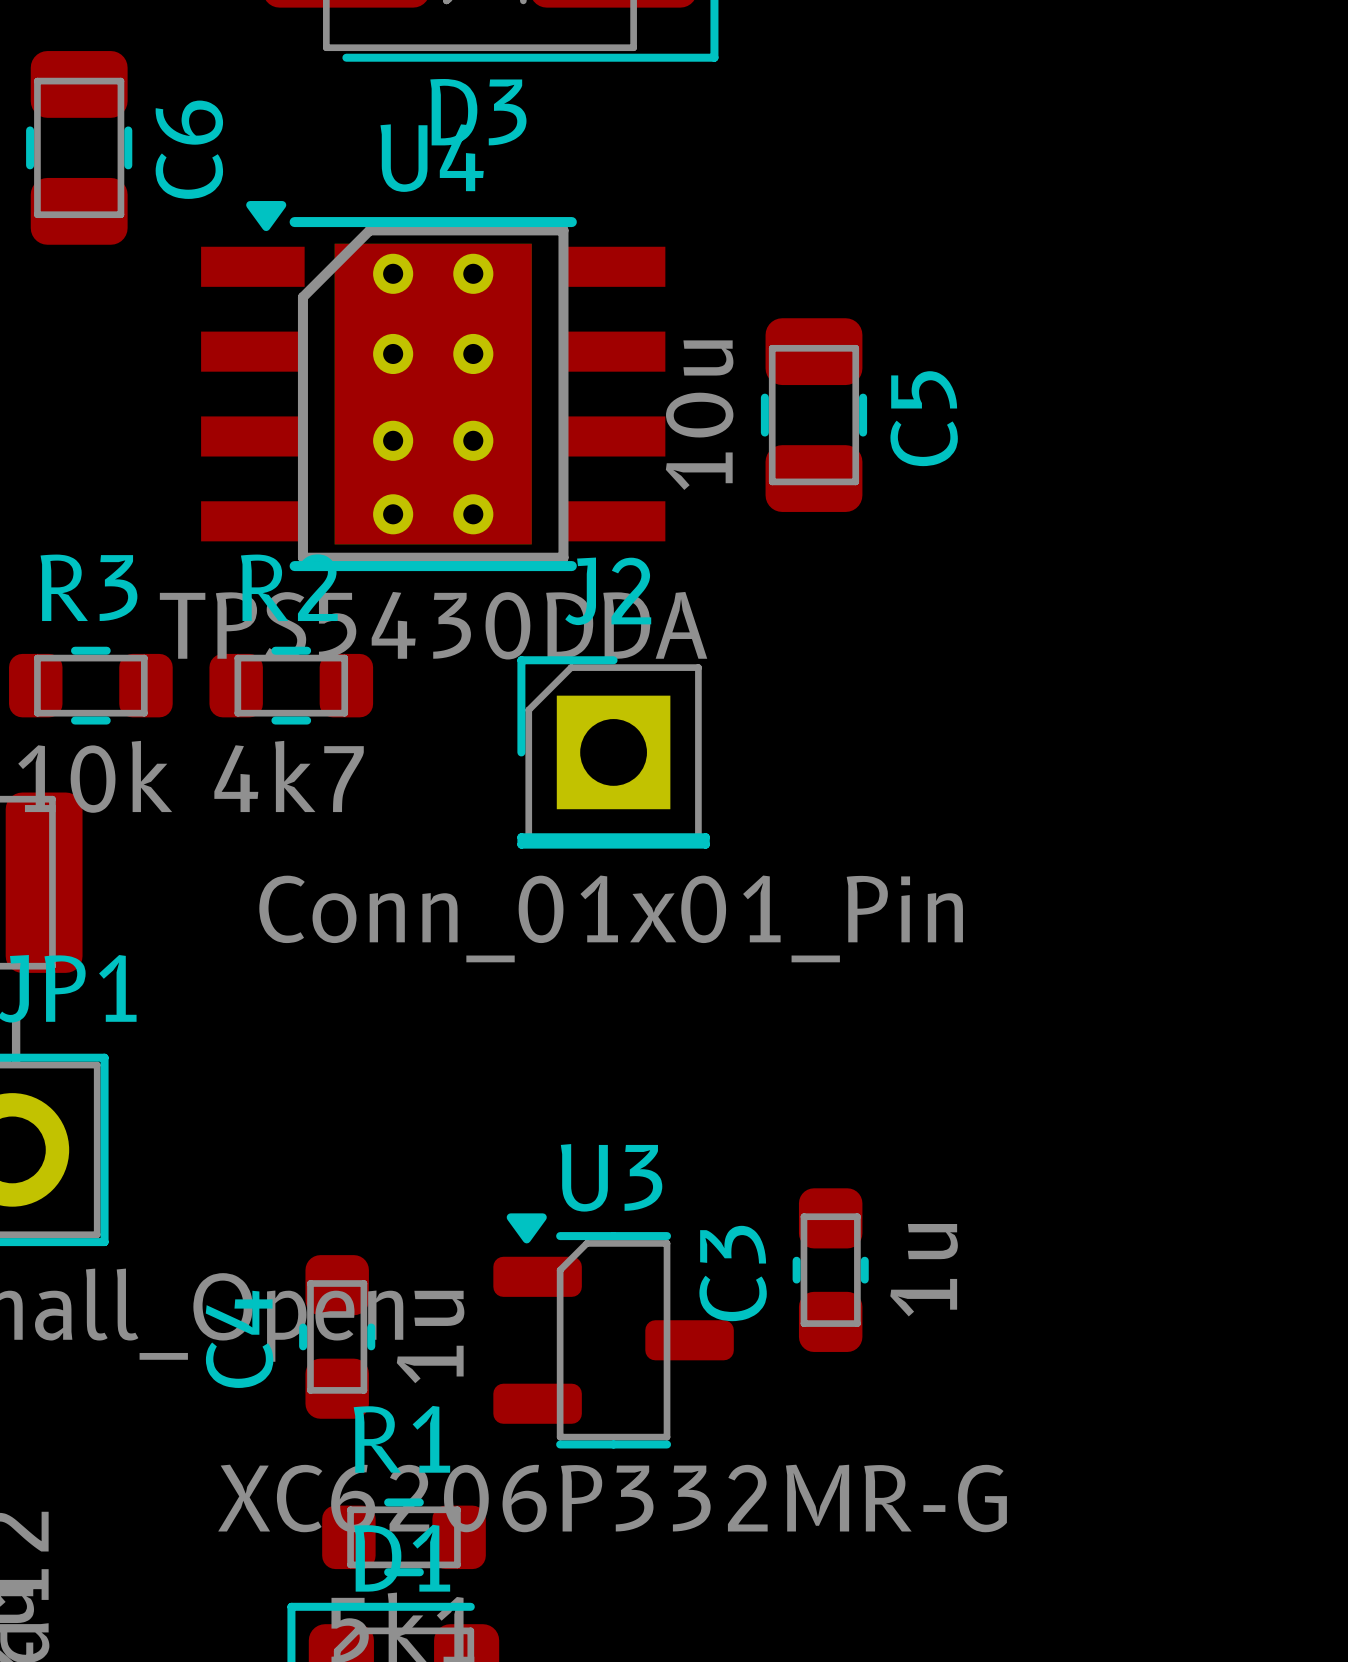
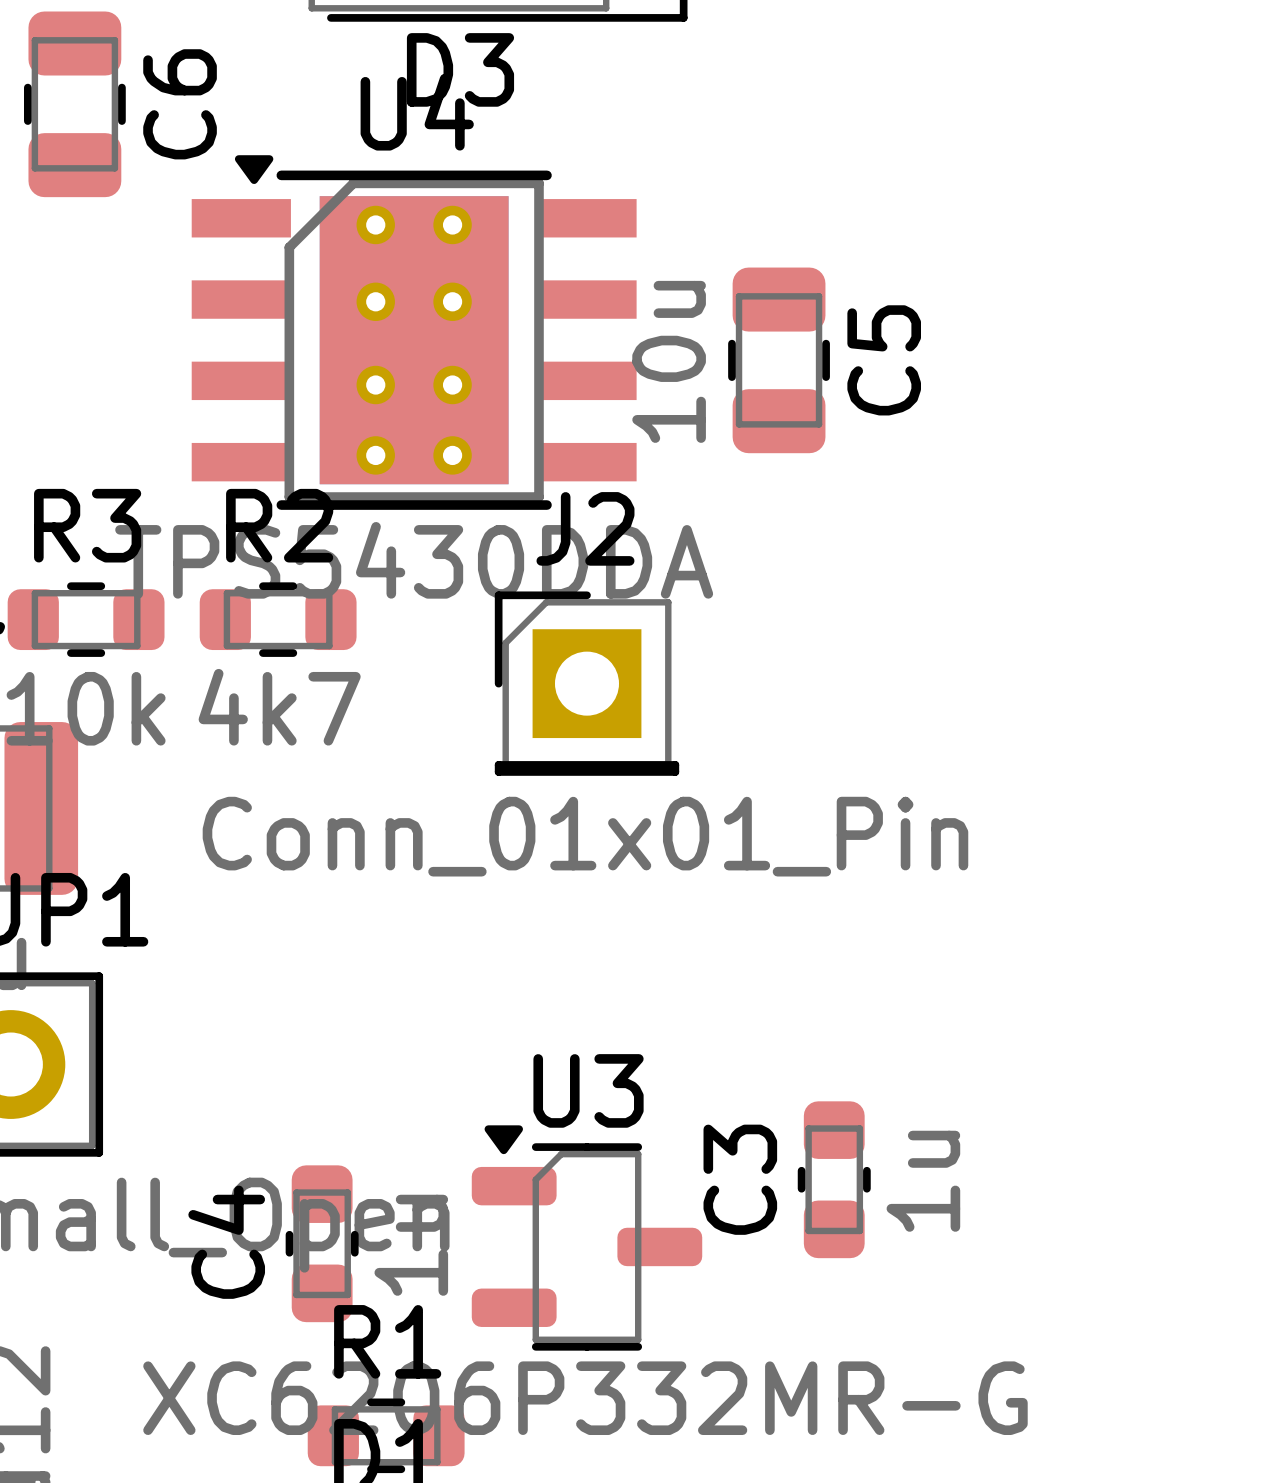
C3 position: (830, 1270) -> (834, 1179)

